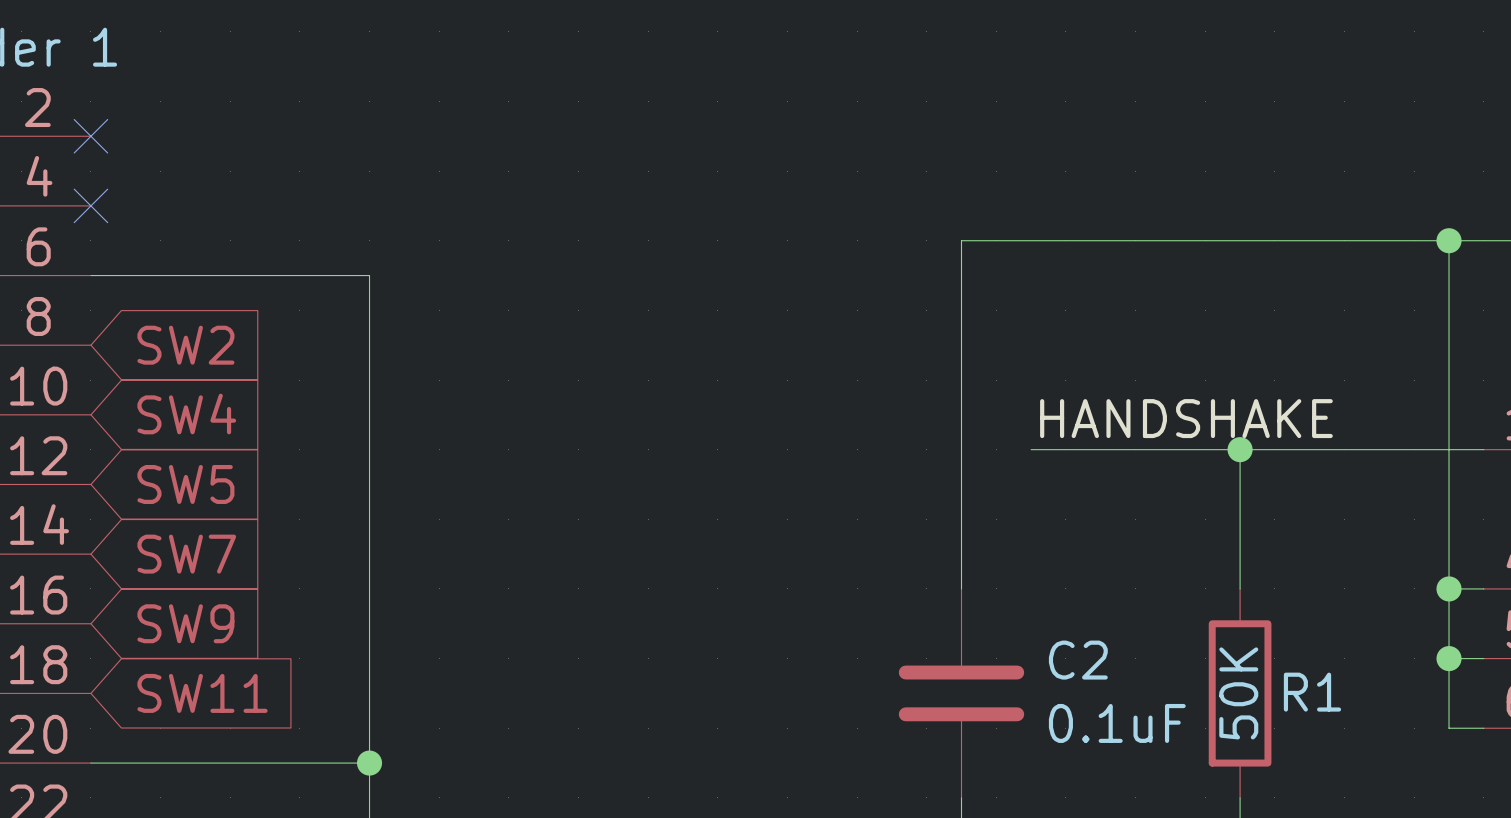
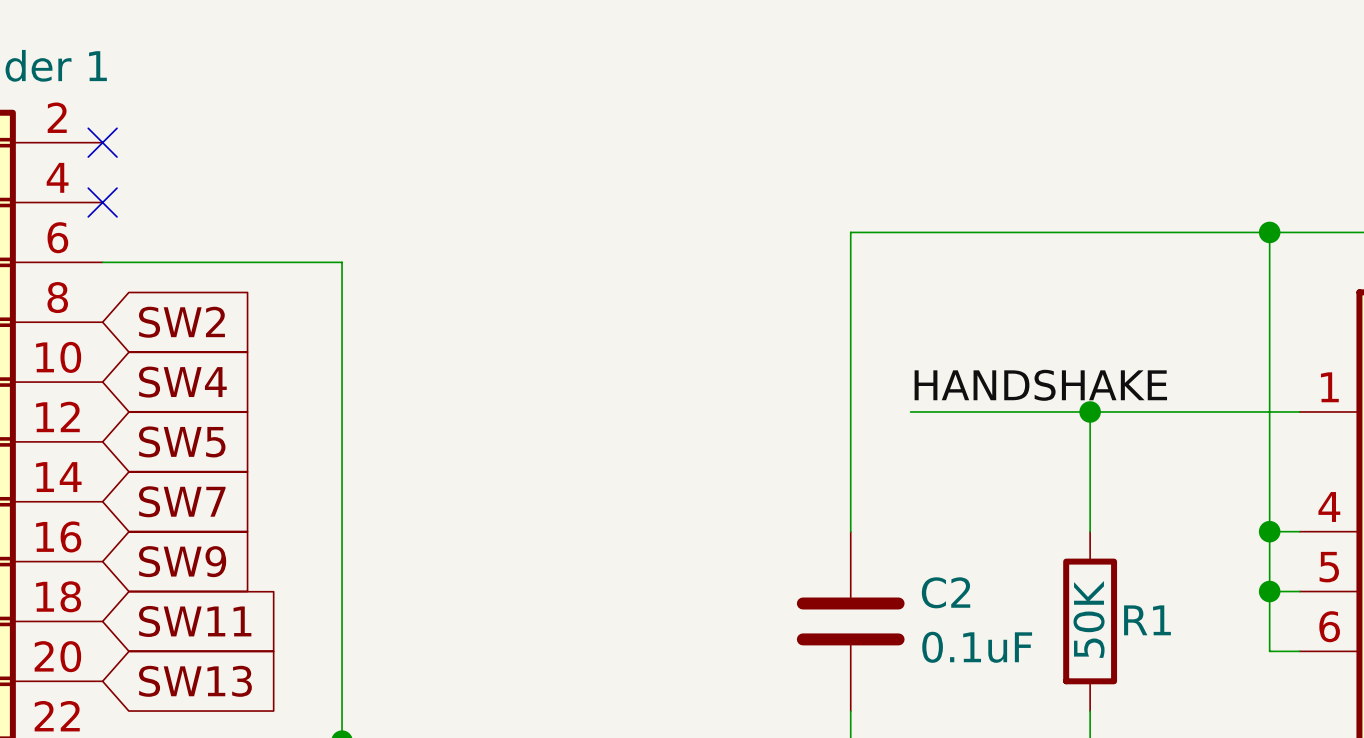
wire: (90, 763) (369, 763) -> none
global label: none -> SW13 (195, 681)
junction: (369, 763) -> none

